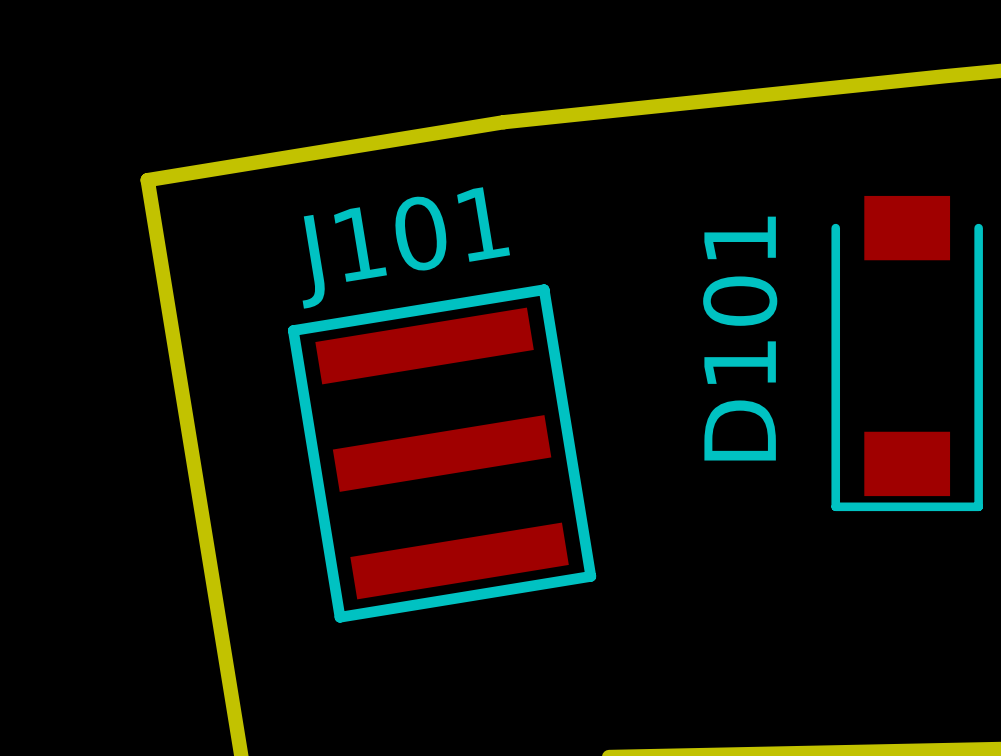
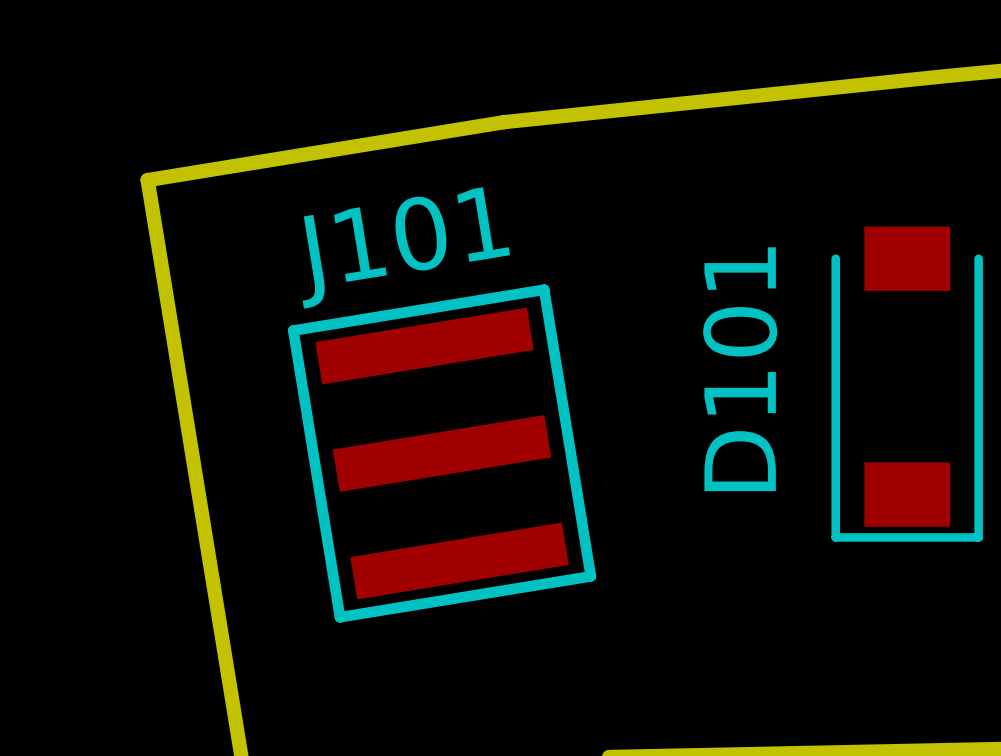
D101 position: (907, 353) -> (907, 384)

